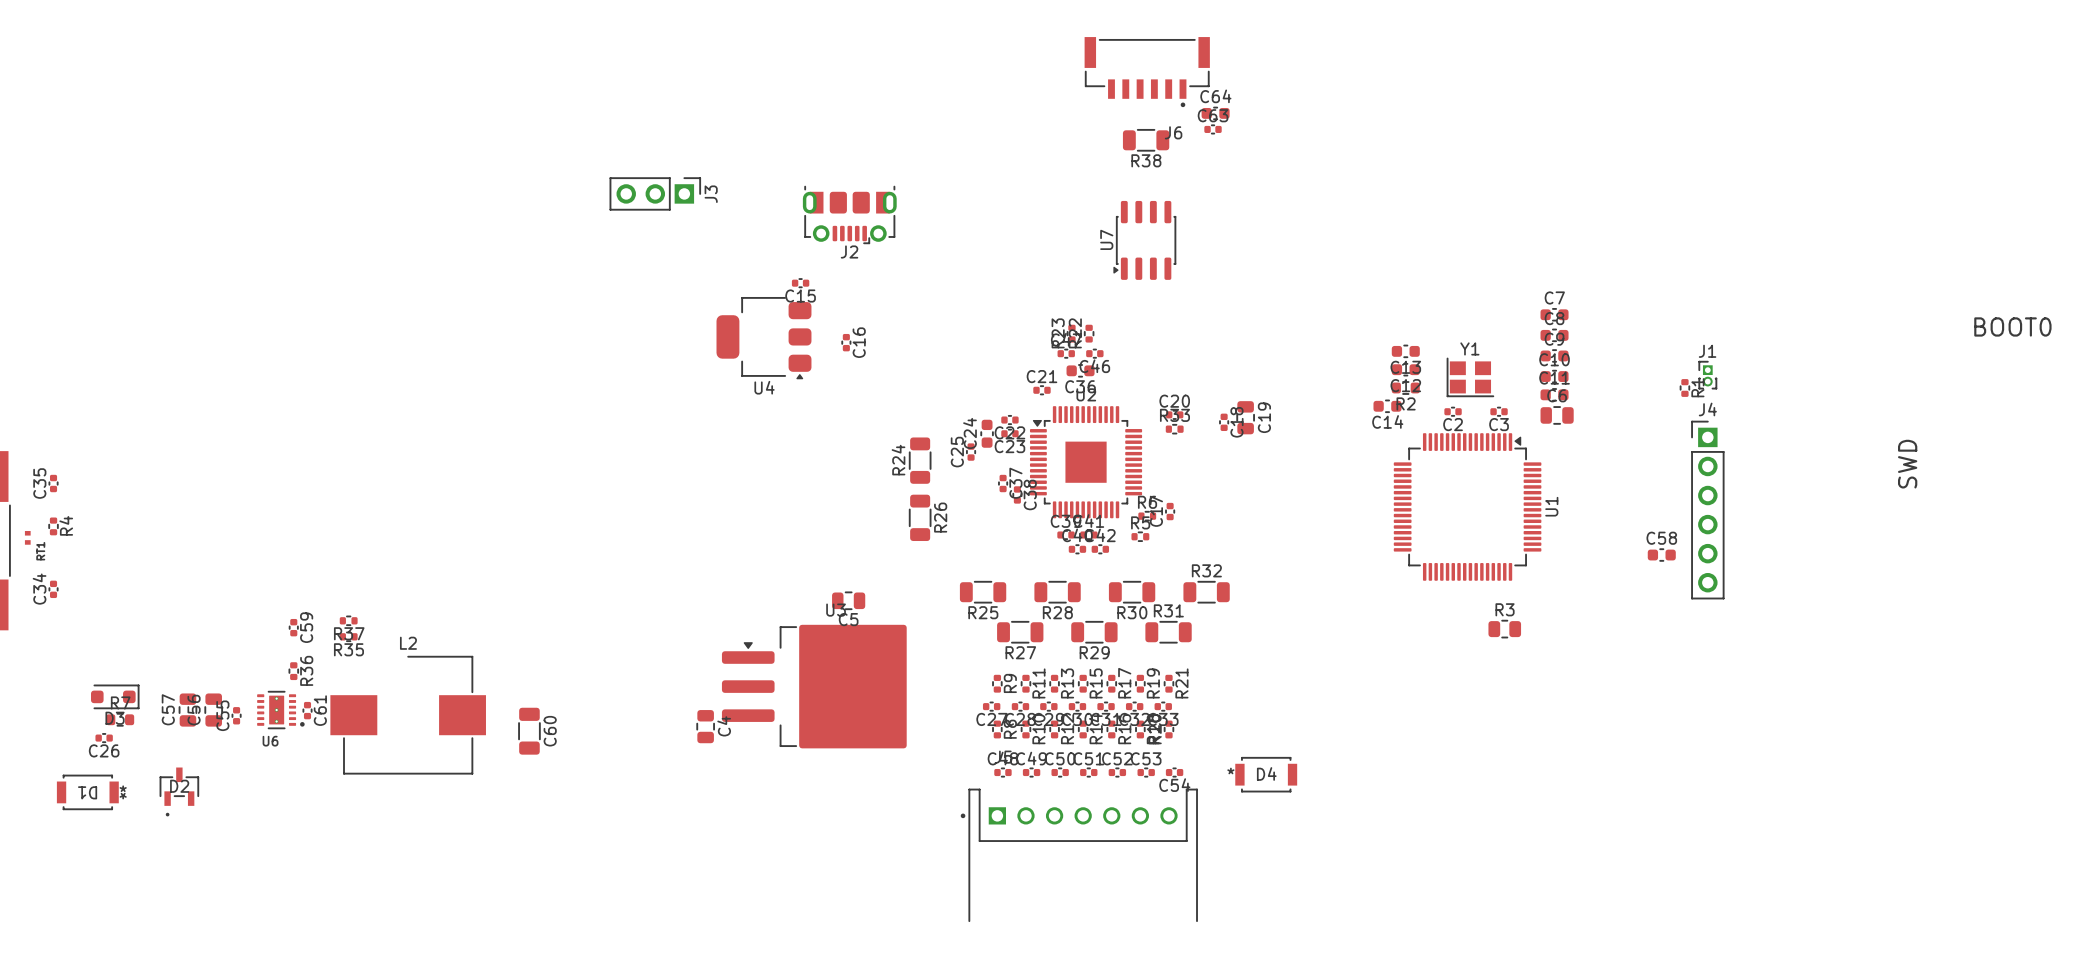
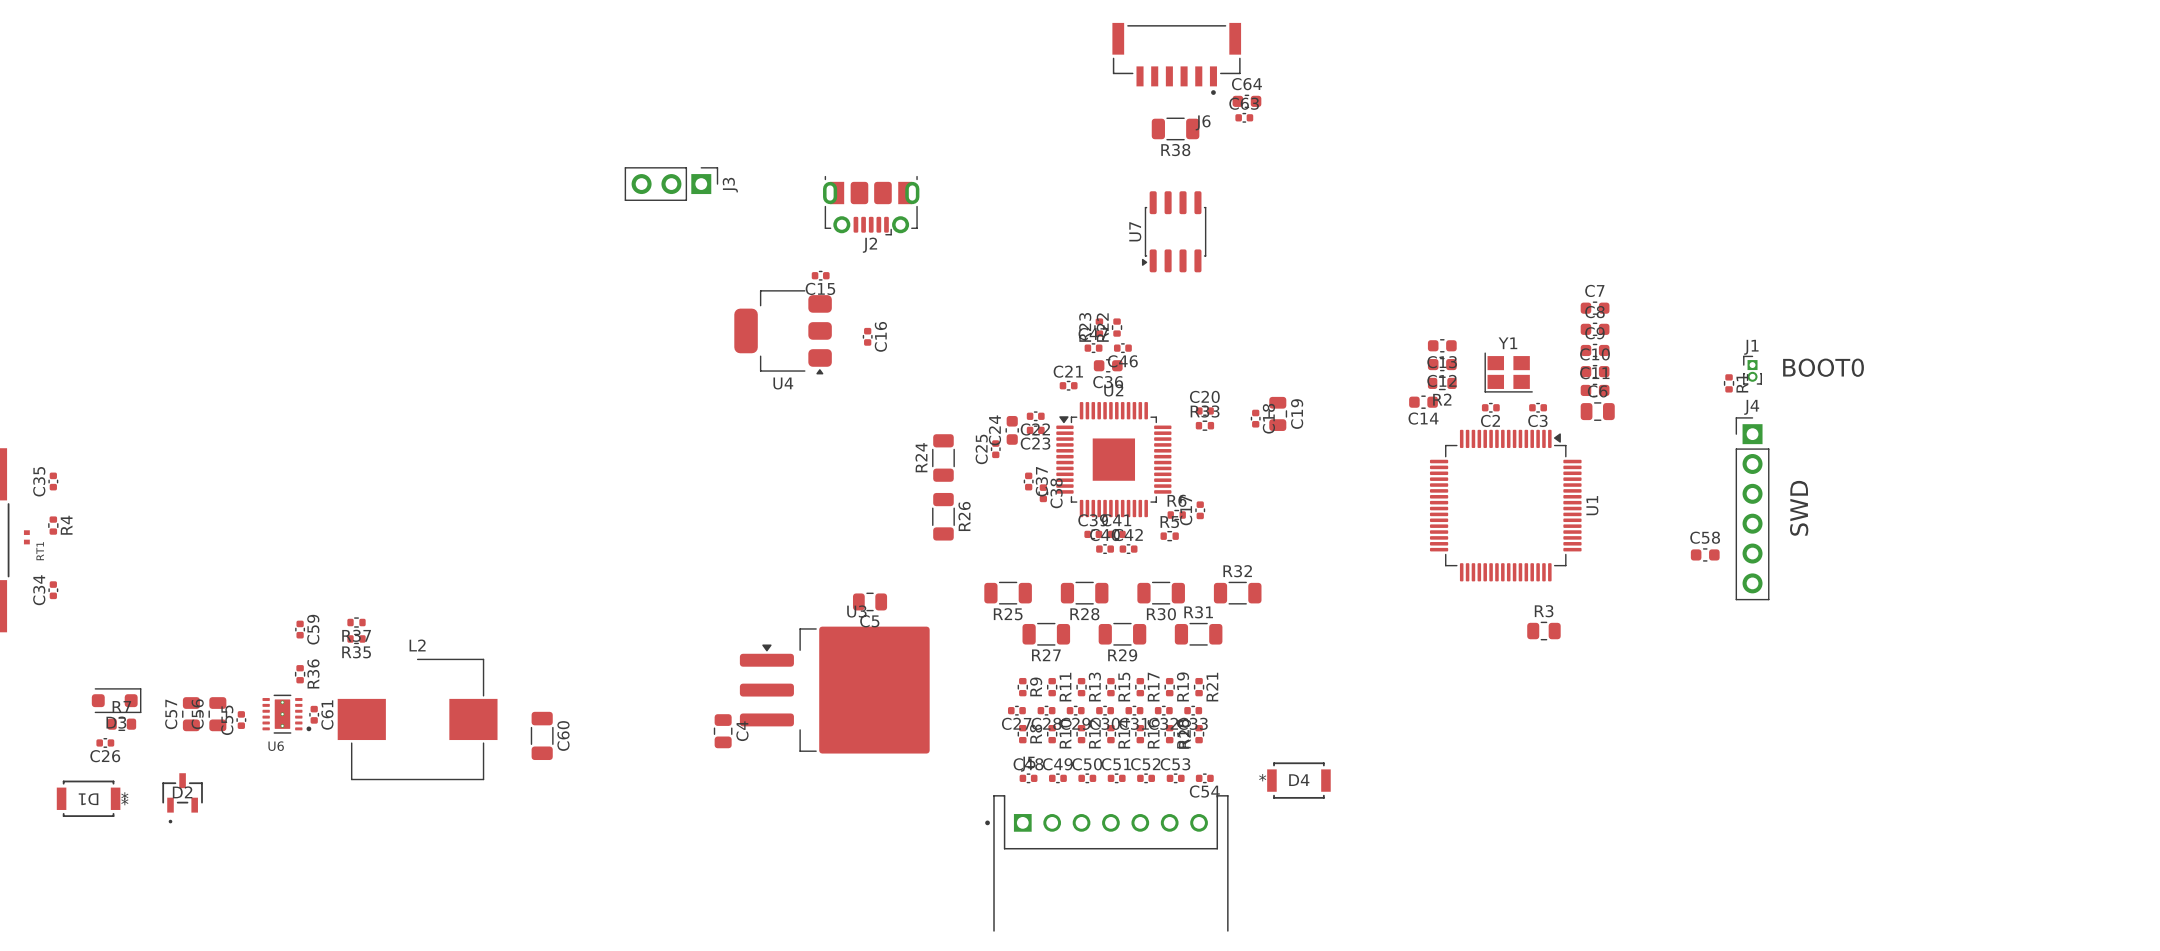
text position: BOOT0 (2012, 326) -> BOOT0 (1823, 367)
text position: SWD (1907, 464) -> SWD (1799, 508)

